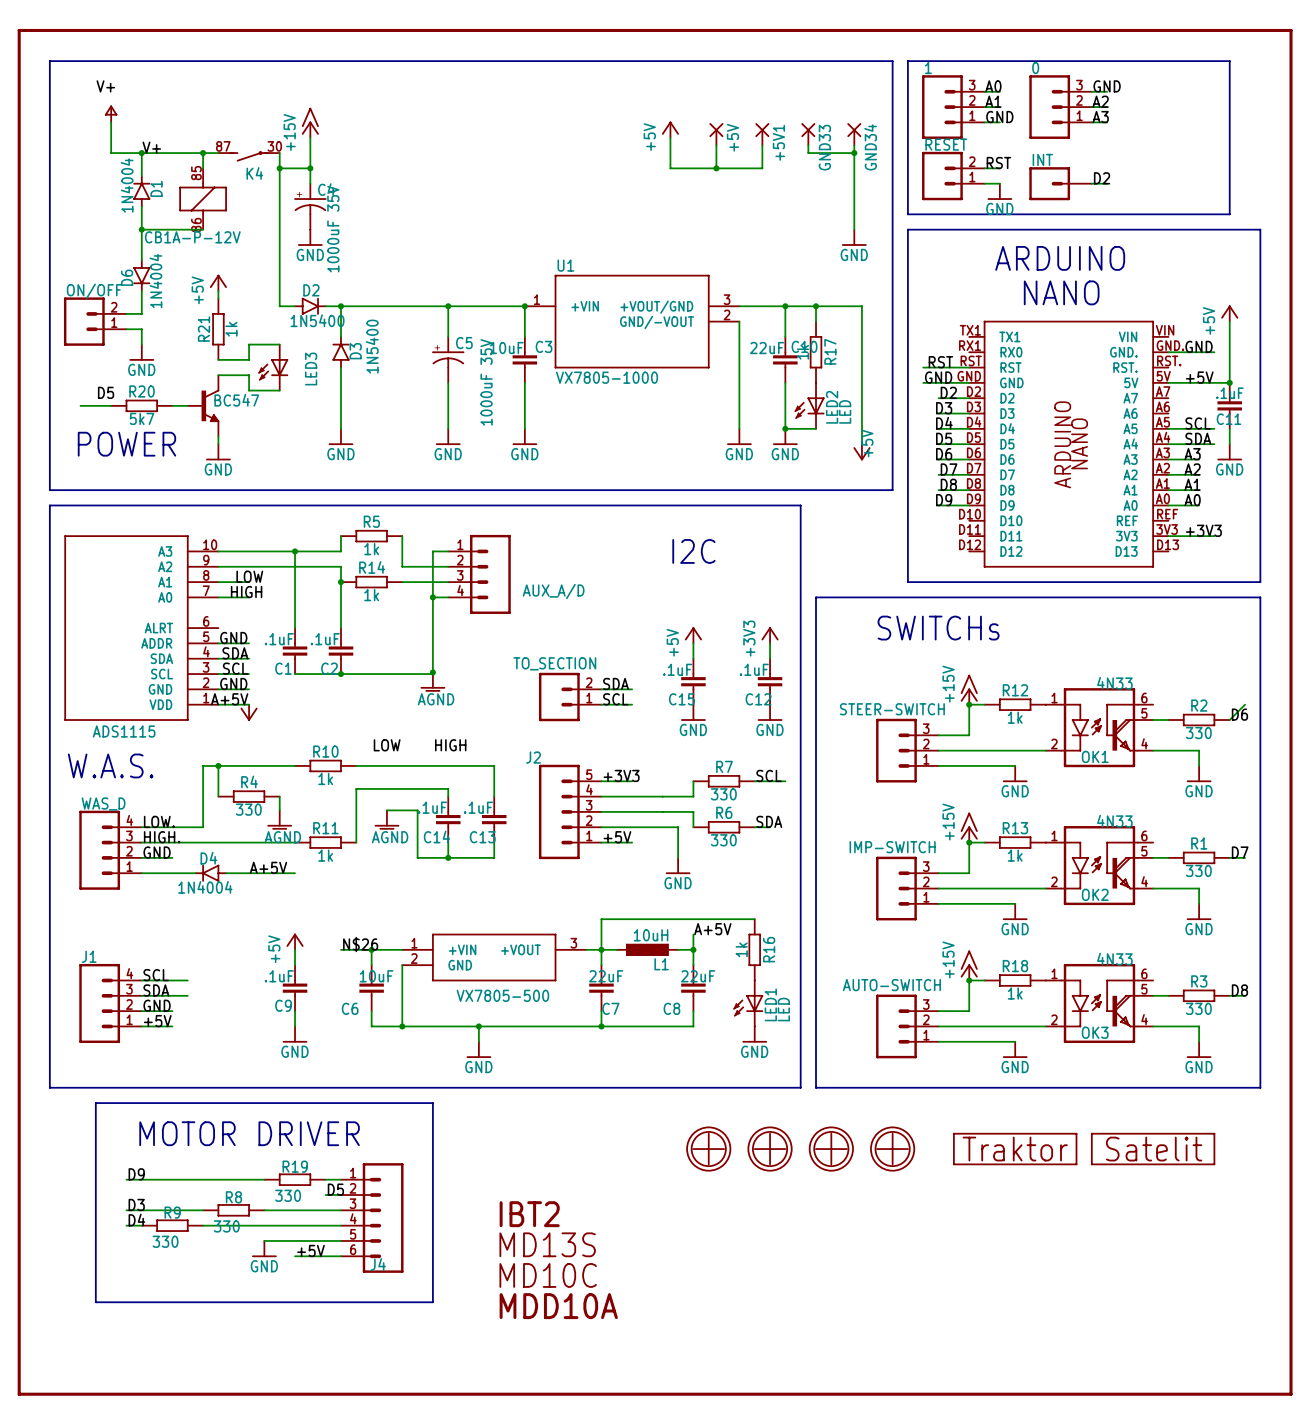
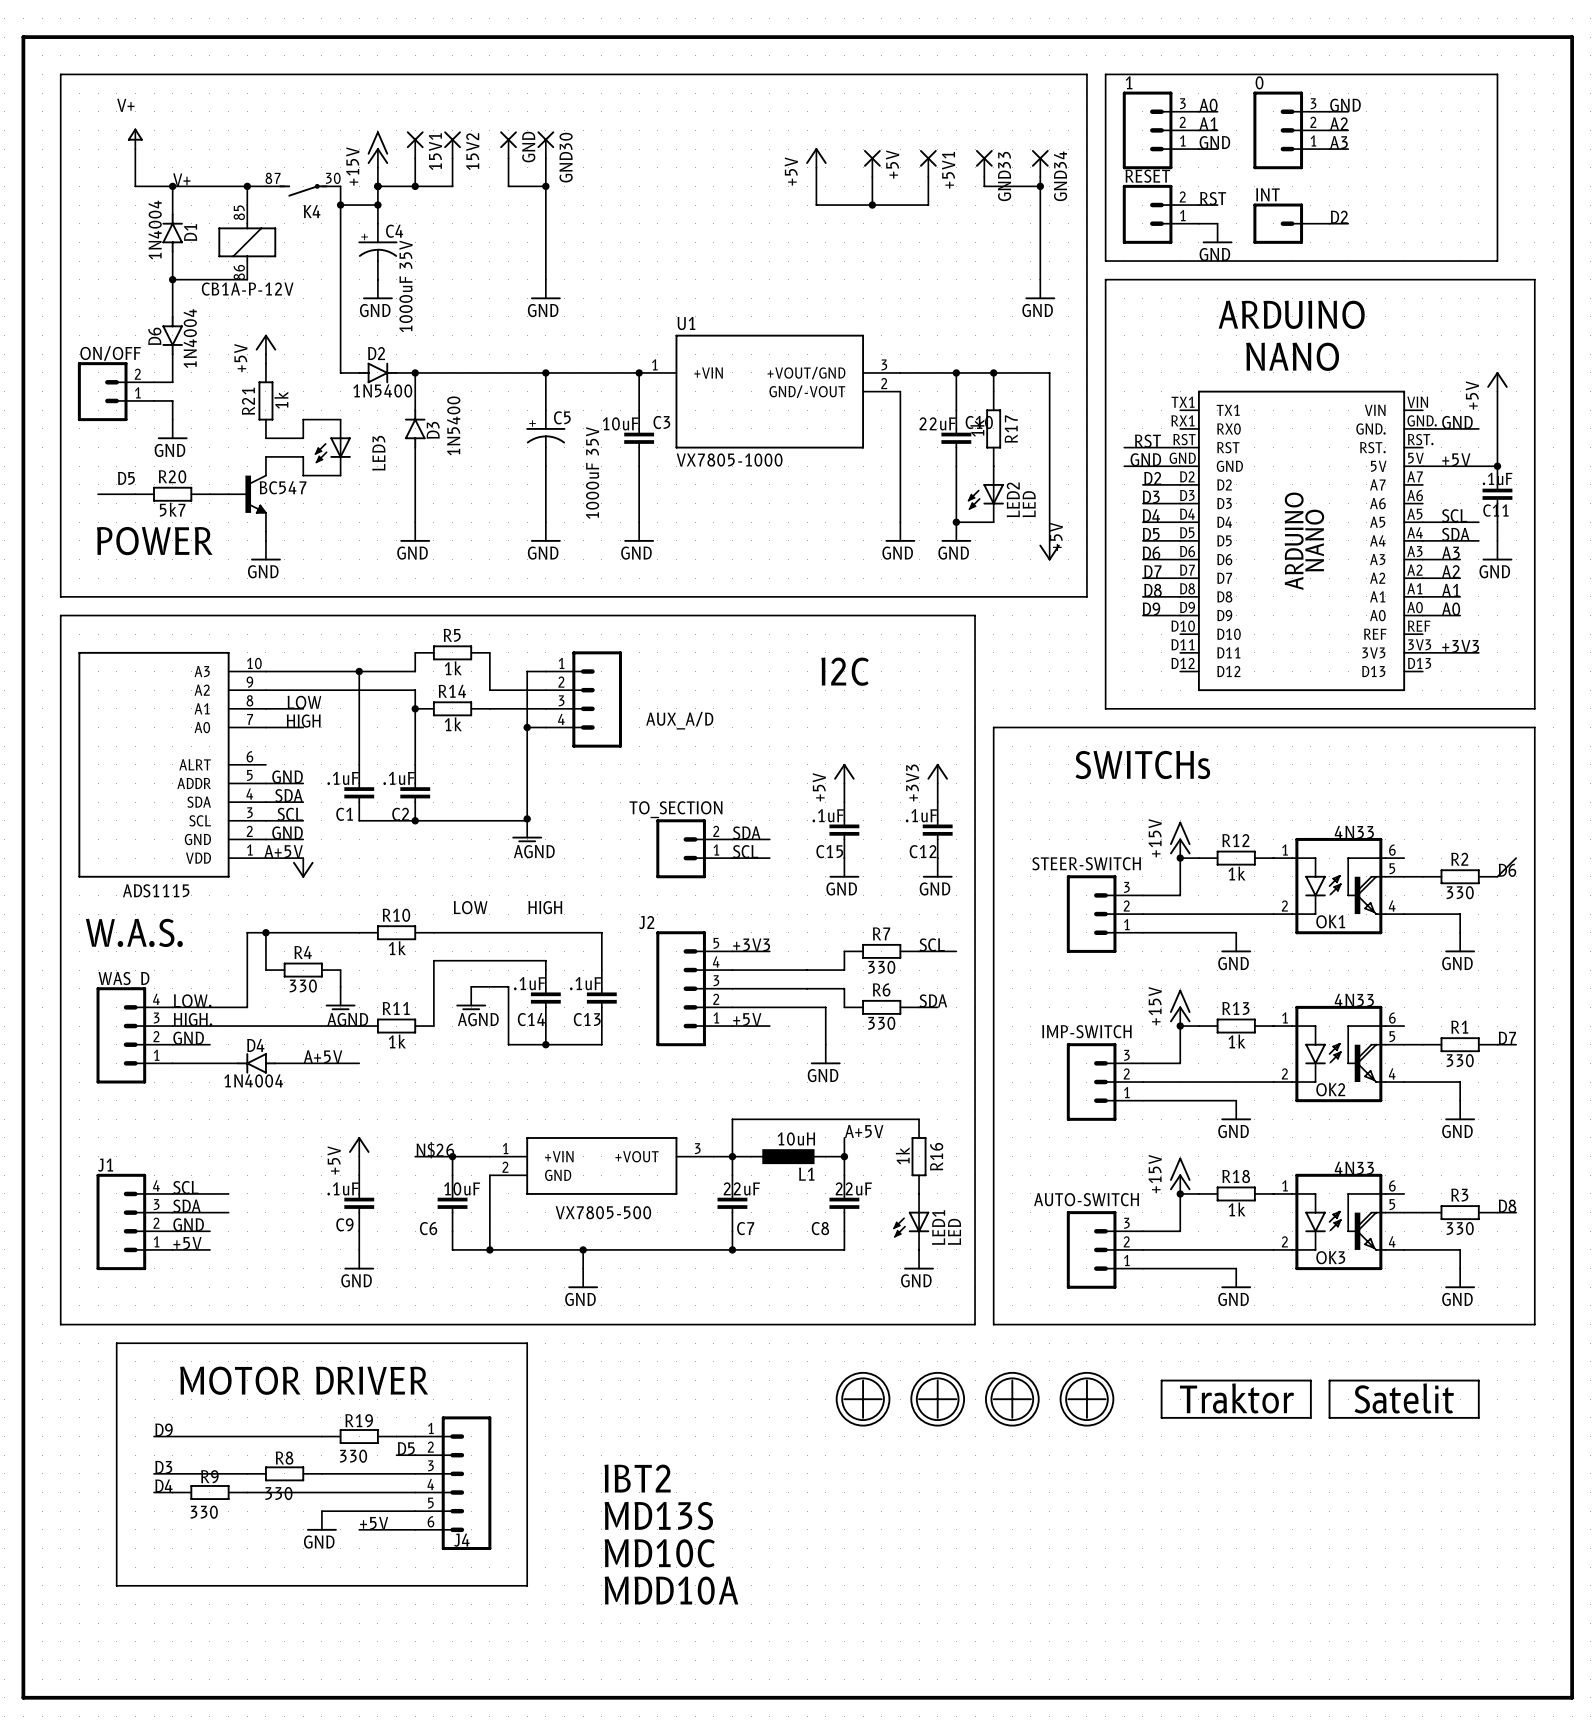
15V1: none -> (415, 144)
15V2: none -> (452, 144)
GND: none -> (508, 144)
GND30: none -> (545, 144)
wire: none -> (415, 158) (415, 186)
wire: none -> (452, 158) (452, 186) (377, 186)
wire: none -> (508, 158) (508, 186) (545, 186)
wire: none -> (545, 158) (545, 279)
junction: none -> (377, 186)
junction: none -> (415, 186)
junction: none -> (545, 186)
power symbol: none -> GND (545, 289)

